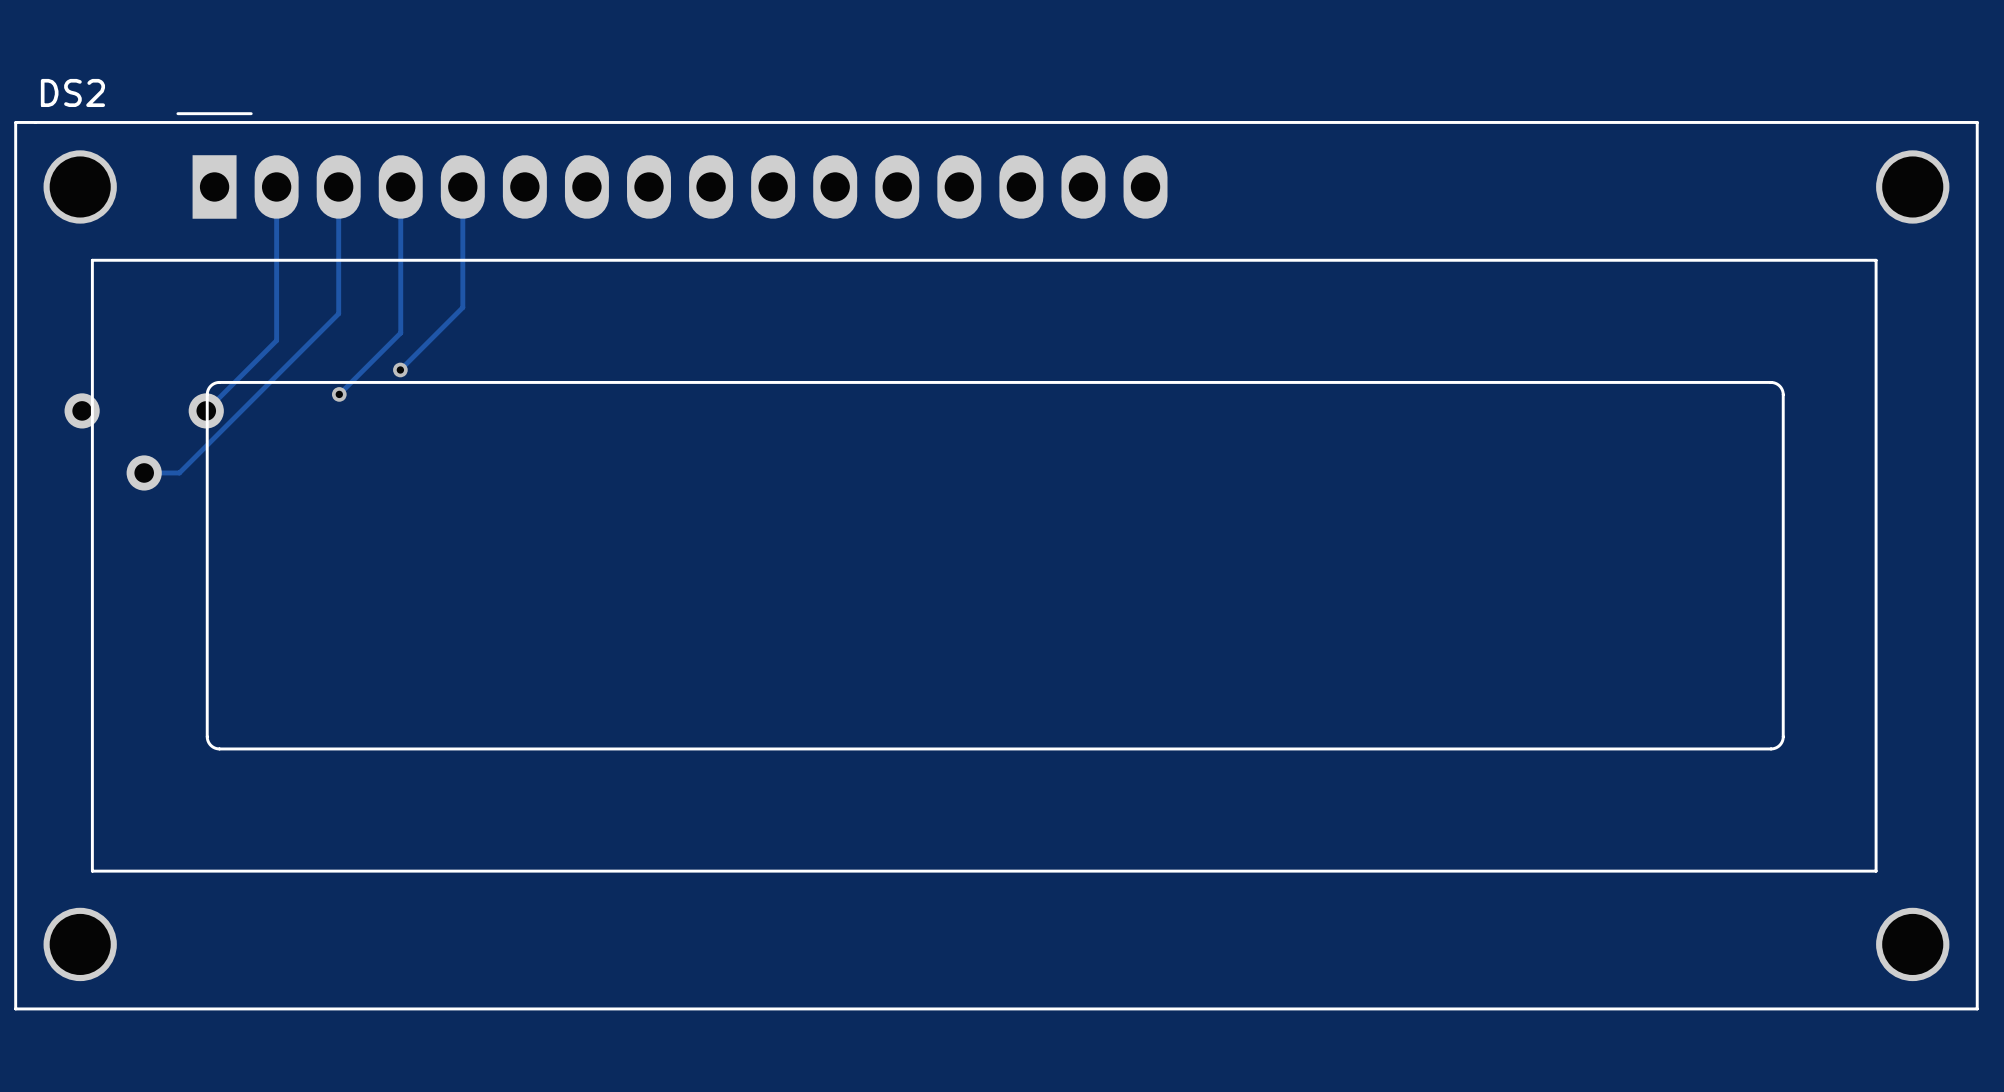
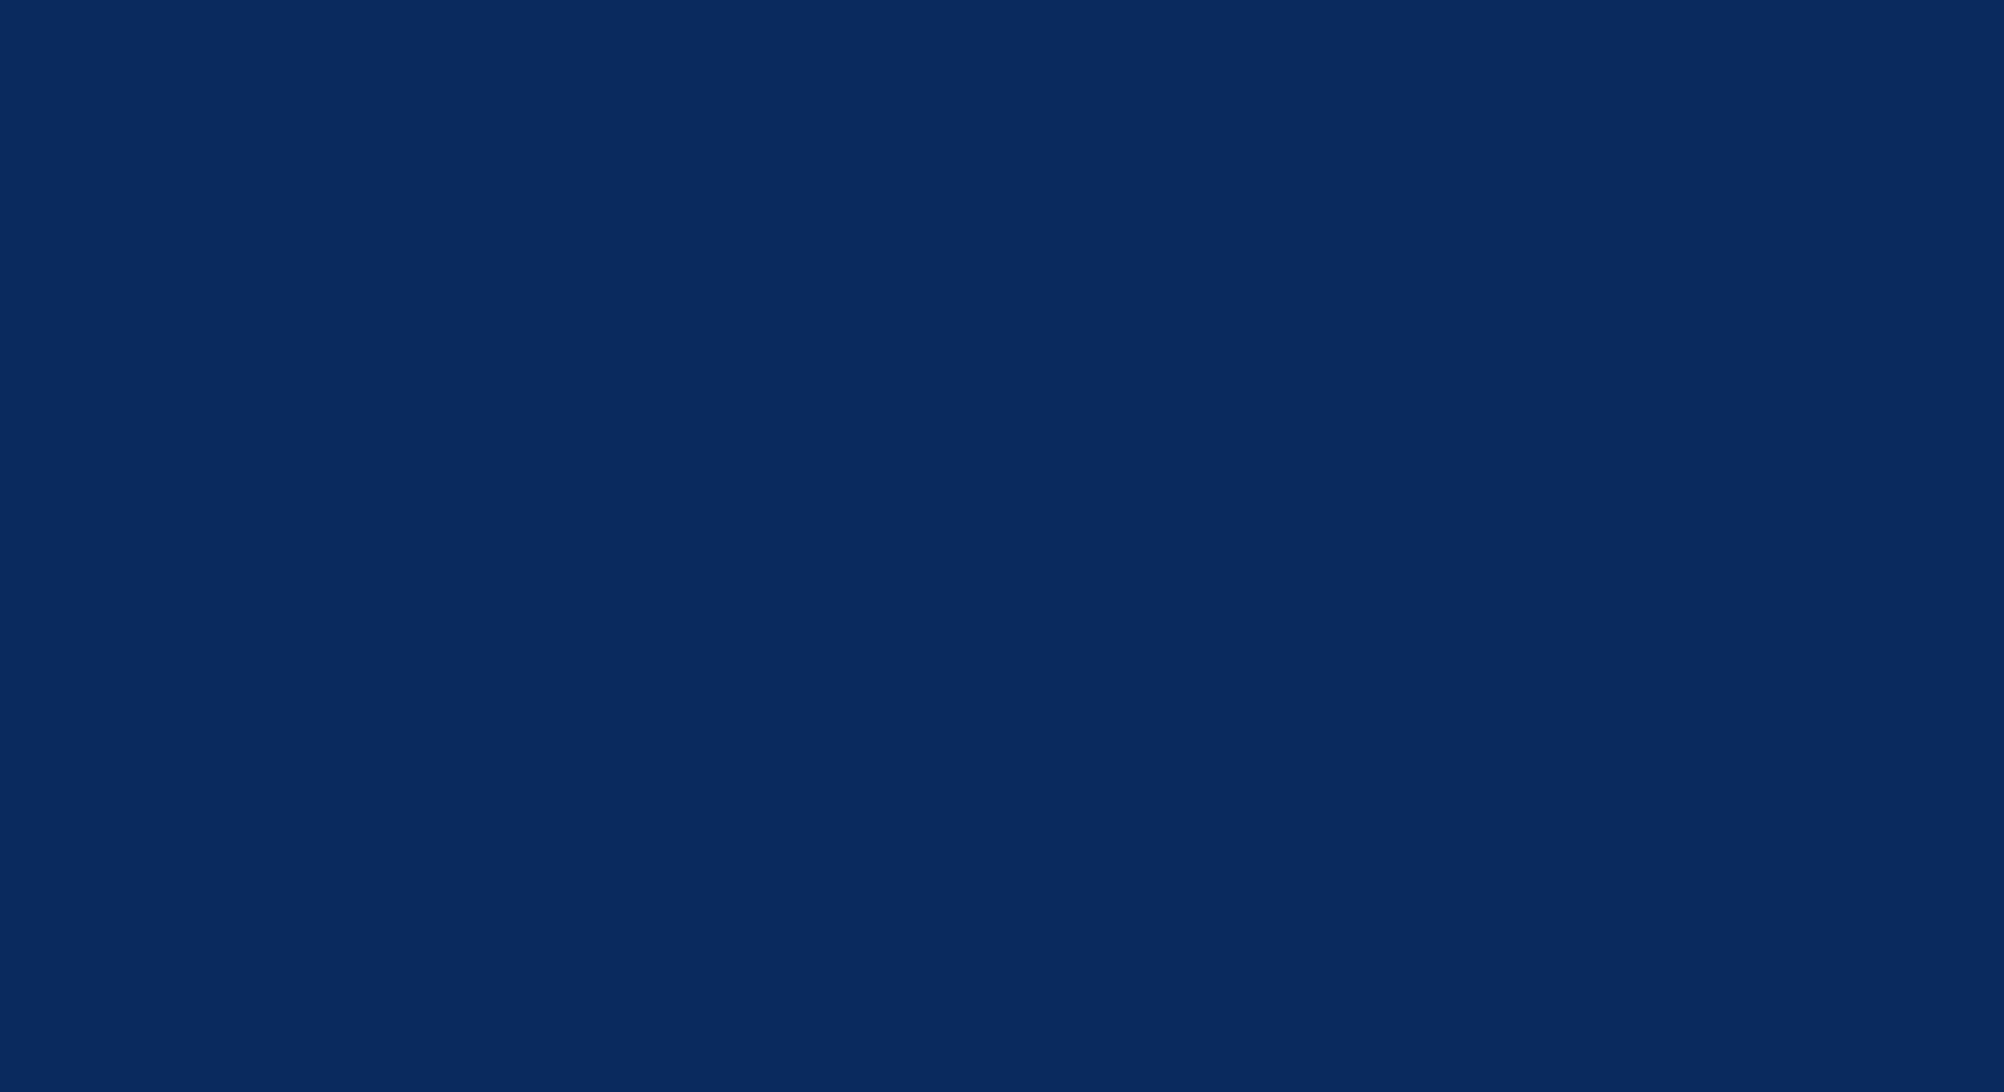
track: (276, 186) (276, 340) (206, 410) -> none
track: (338, 186) (338, 313) (179, 472) (144, 472) -> none
track: (400, 186) (400, 332) (339, 394) -> none
track: (462, 186) (462, 307) (400, 369) -> none
via: (400, 369) -> none
via: (339, 394) -> none
part: (144, 441) -> none
DS2: (996, 561) -> none

